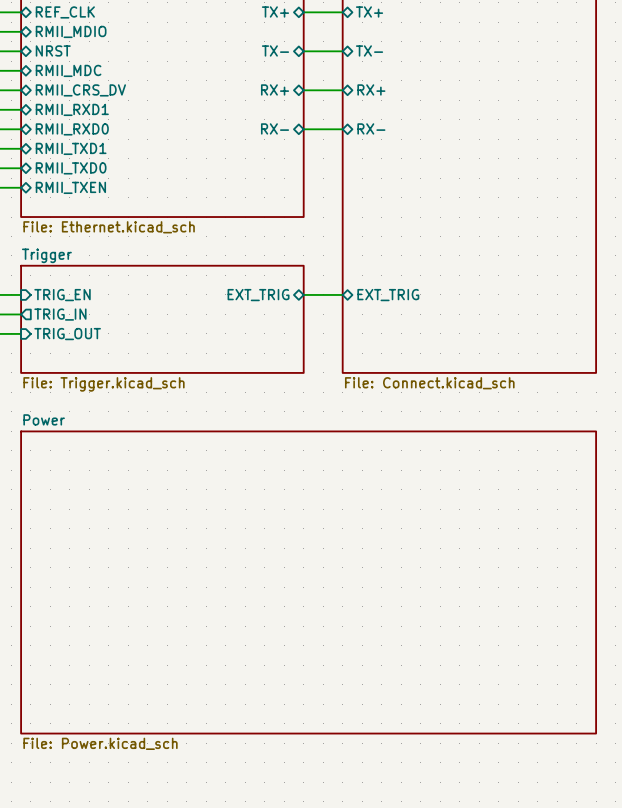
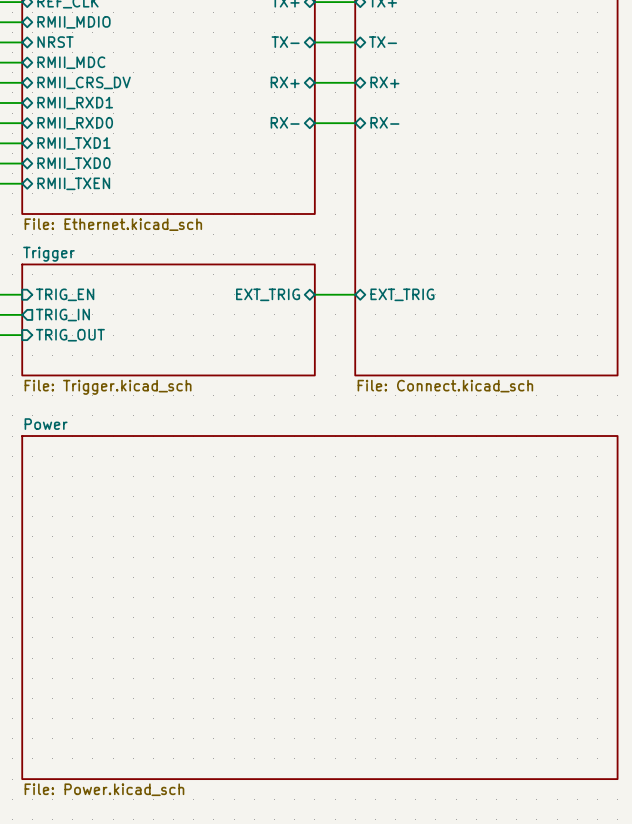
sheet Power: File: Power.kicad_sch (308, 582) -> none
sheet Power: none -> File: Power.kicad_sch (319, 607)

